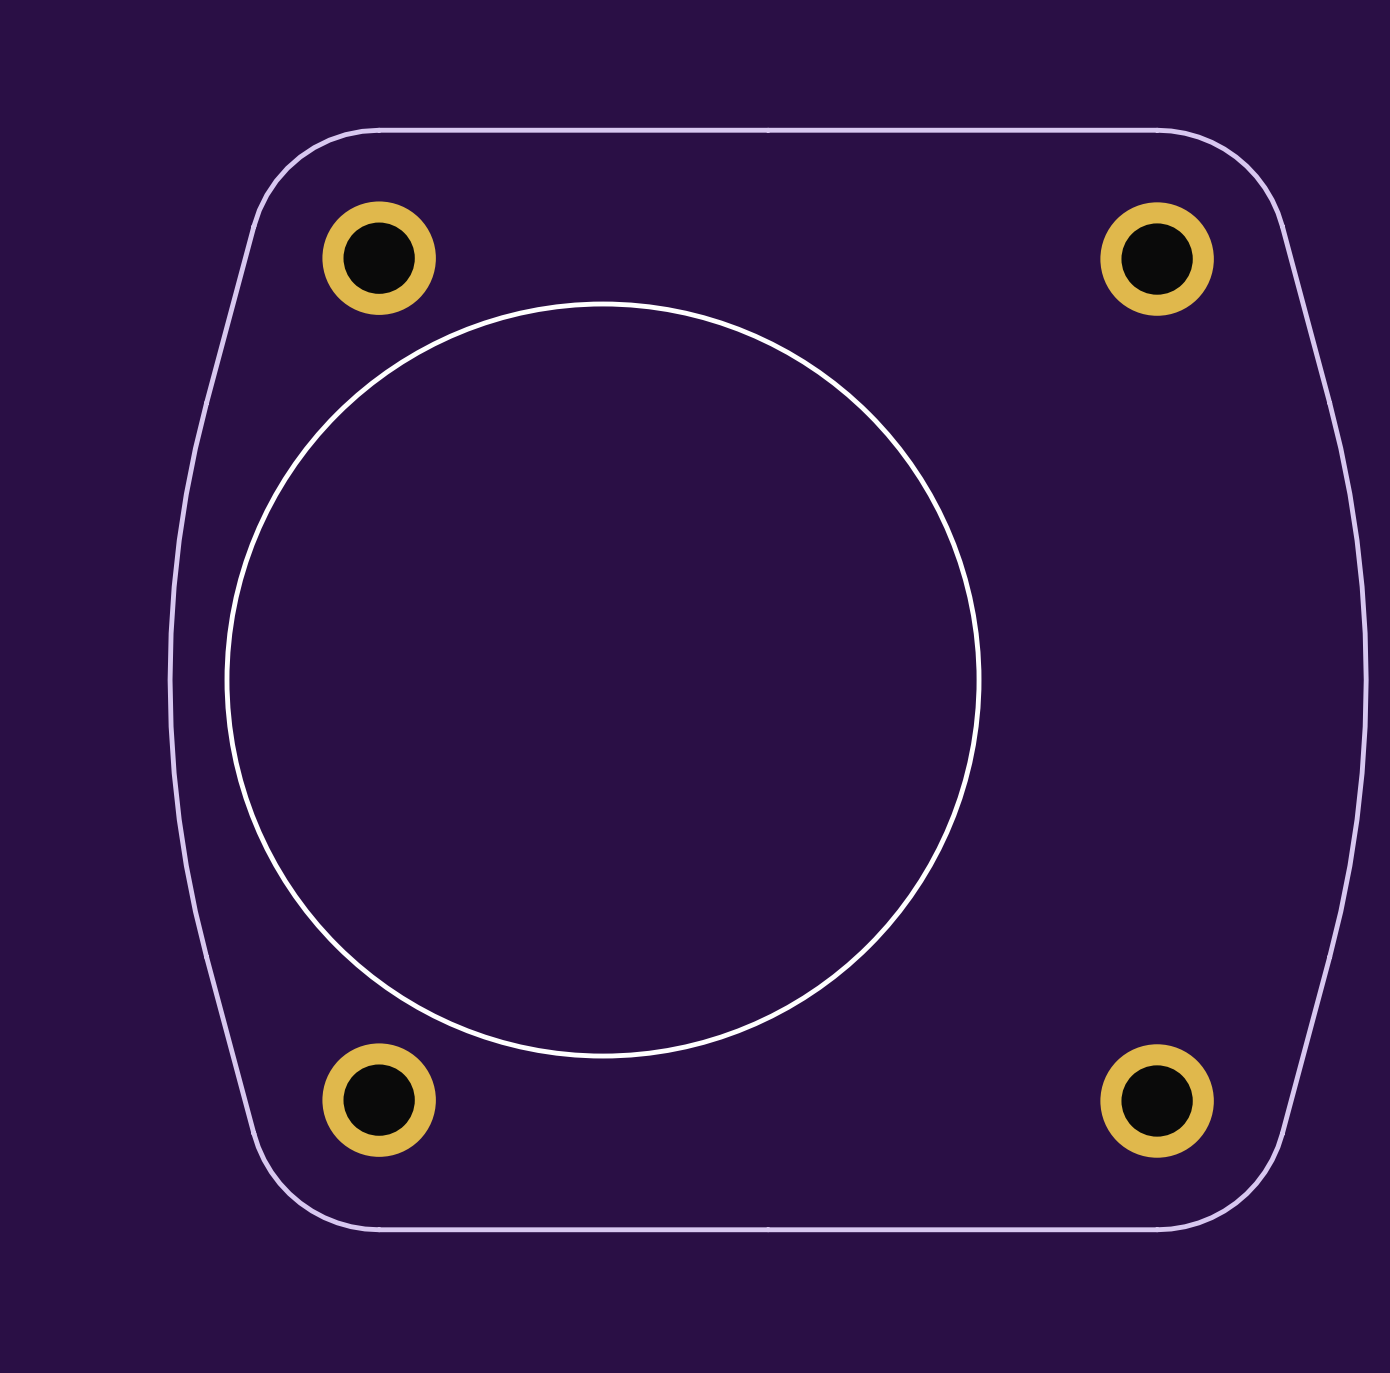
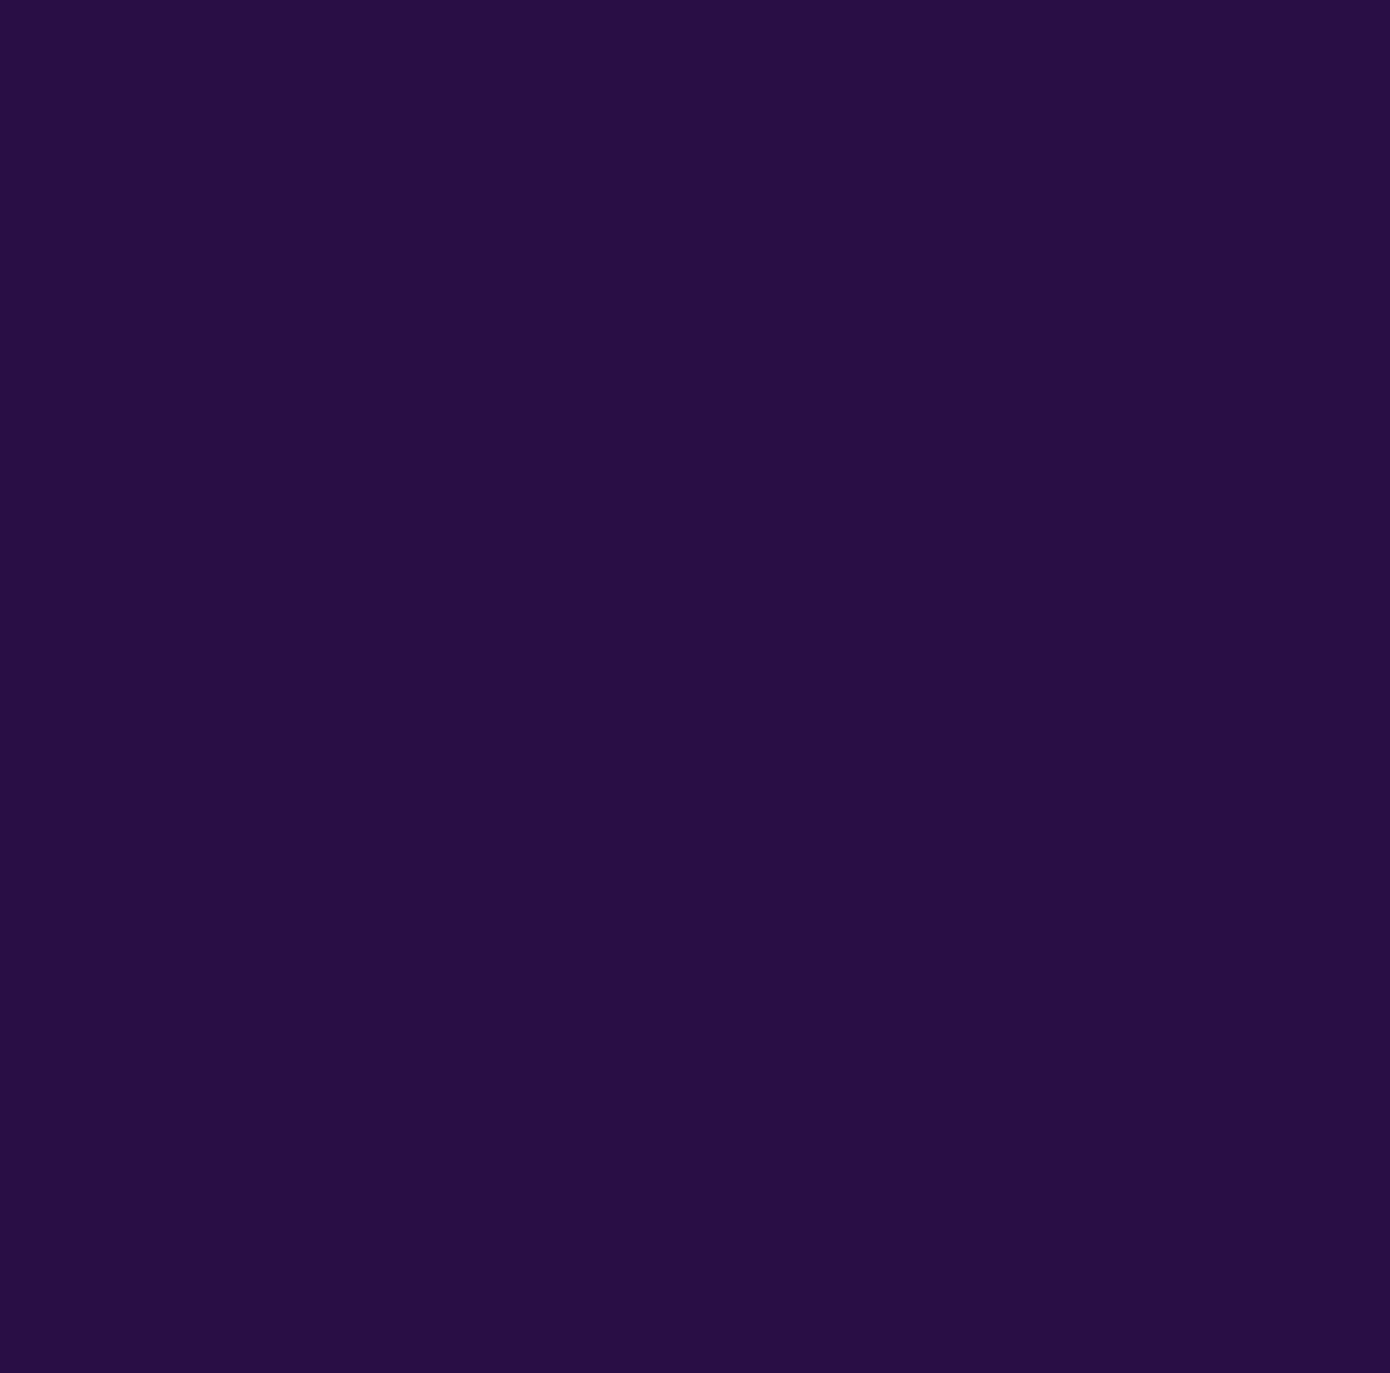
board edge: (1157, 130) (379, 130) (362, 131) (329, 140) (300, 157) (276, 180) (259, 210) (253, 226) (206, 403) (186, 494) (174, 586) (171, 633) (171, 726) (179, 819) (195, 911) (253, 1133) (258, 1147) (271, 1172) (279, 1183) (300, 1202) (324, 1217) (337, 1222) (365, 1228) (379, 1229) (1157, 1229) (1185, 1226) (1211, 1217) (1236, 1202) (1256, 1183) (1272, 1159) (1282, 1133) (1329, 956) (1349, 865) (1362, 773) (1365, 726) (1366, 680) (1362, 586) (1357, 540) (1340, 448) (1277, 212) (1264, 187) (1246, 166) (1236, 157) (1211, 142) (1198, 137) (1185, 133) (1157, 130) -> none
part: (379, 258) -> none
part: (1157, 259) -> none
drawing: [224, 301, 982, 1059] -> none
part: (379, 1100) -> none
part: (1157, 1100) -> none

